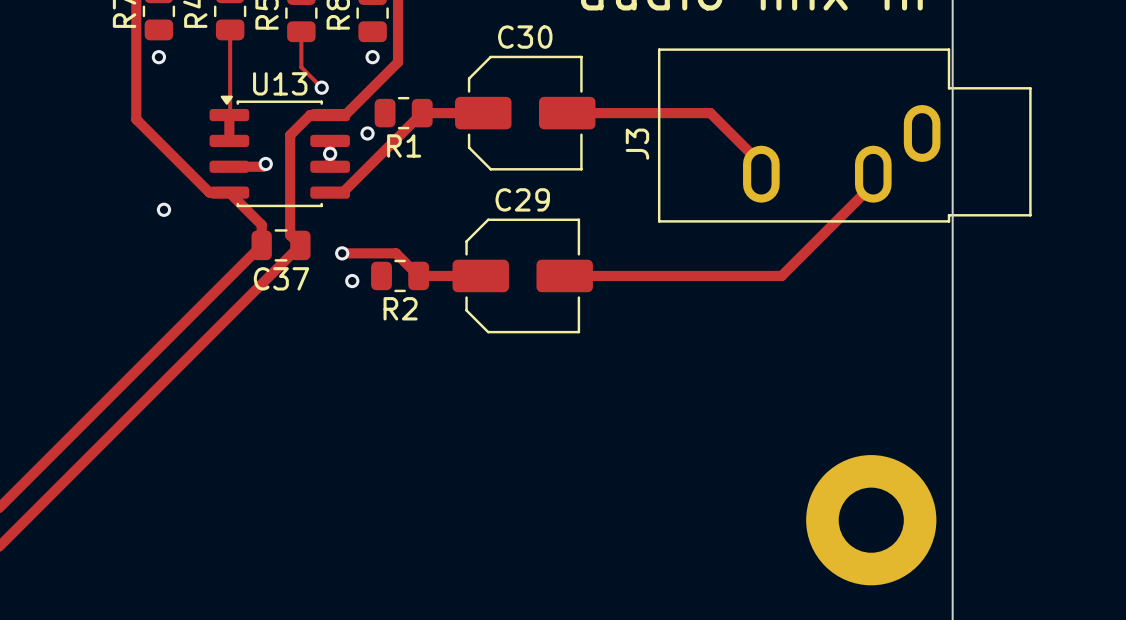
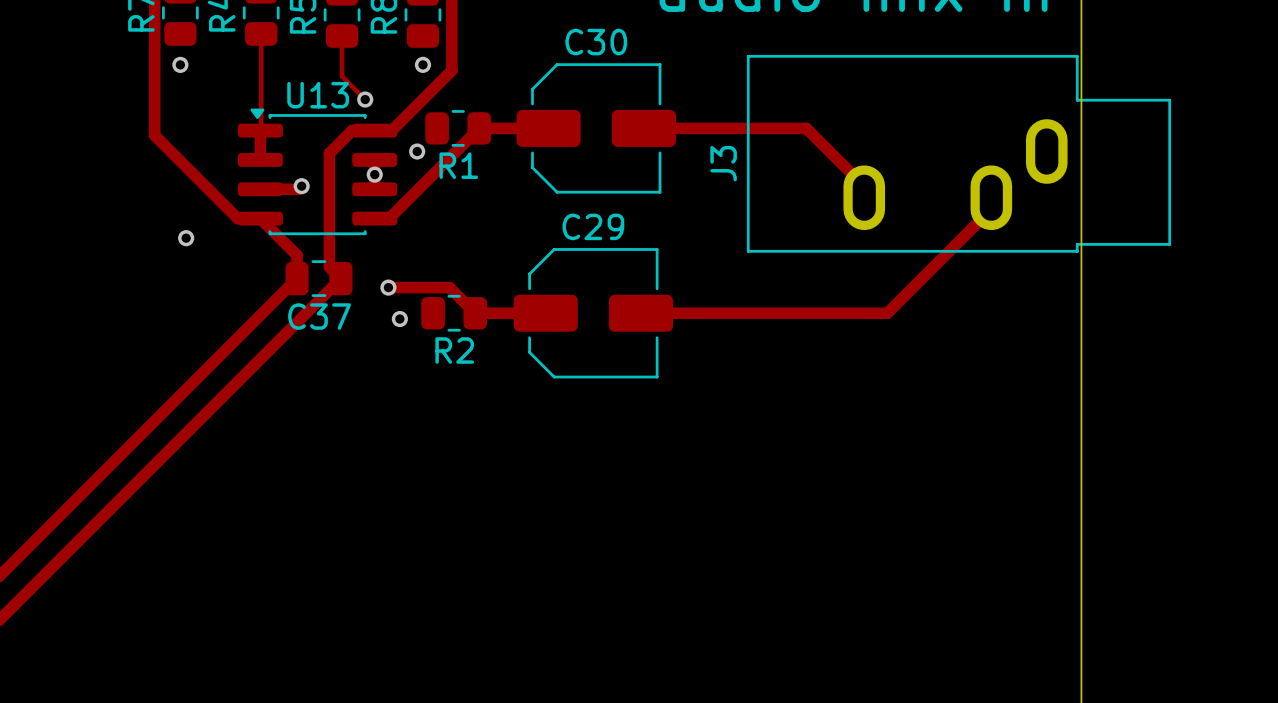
part: (871, 520) -> none

